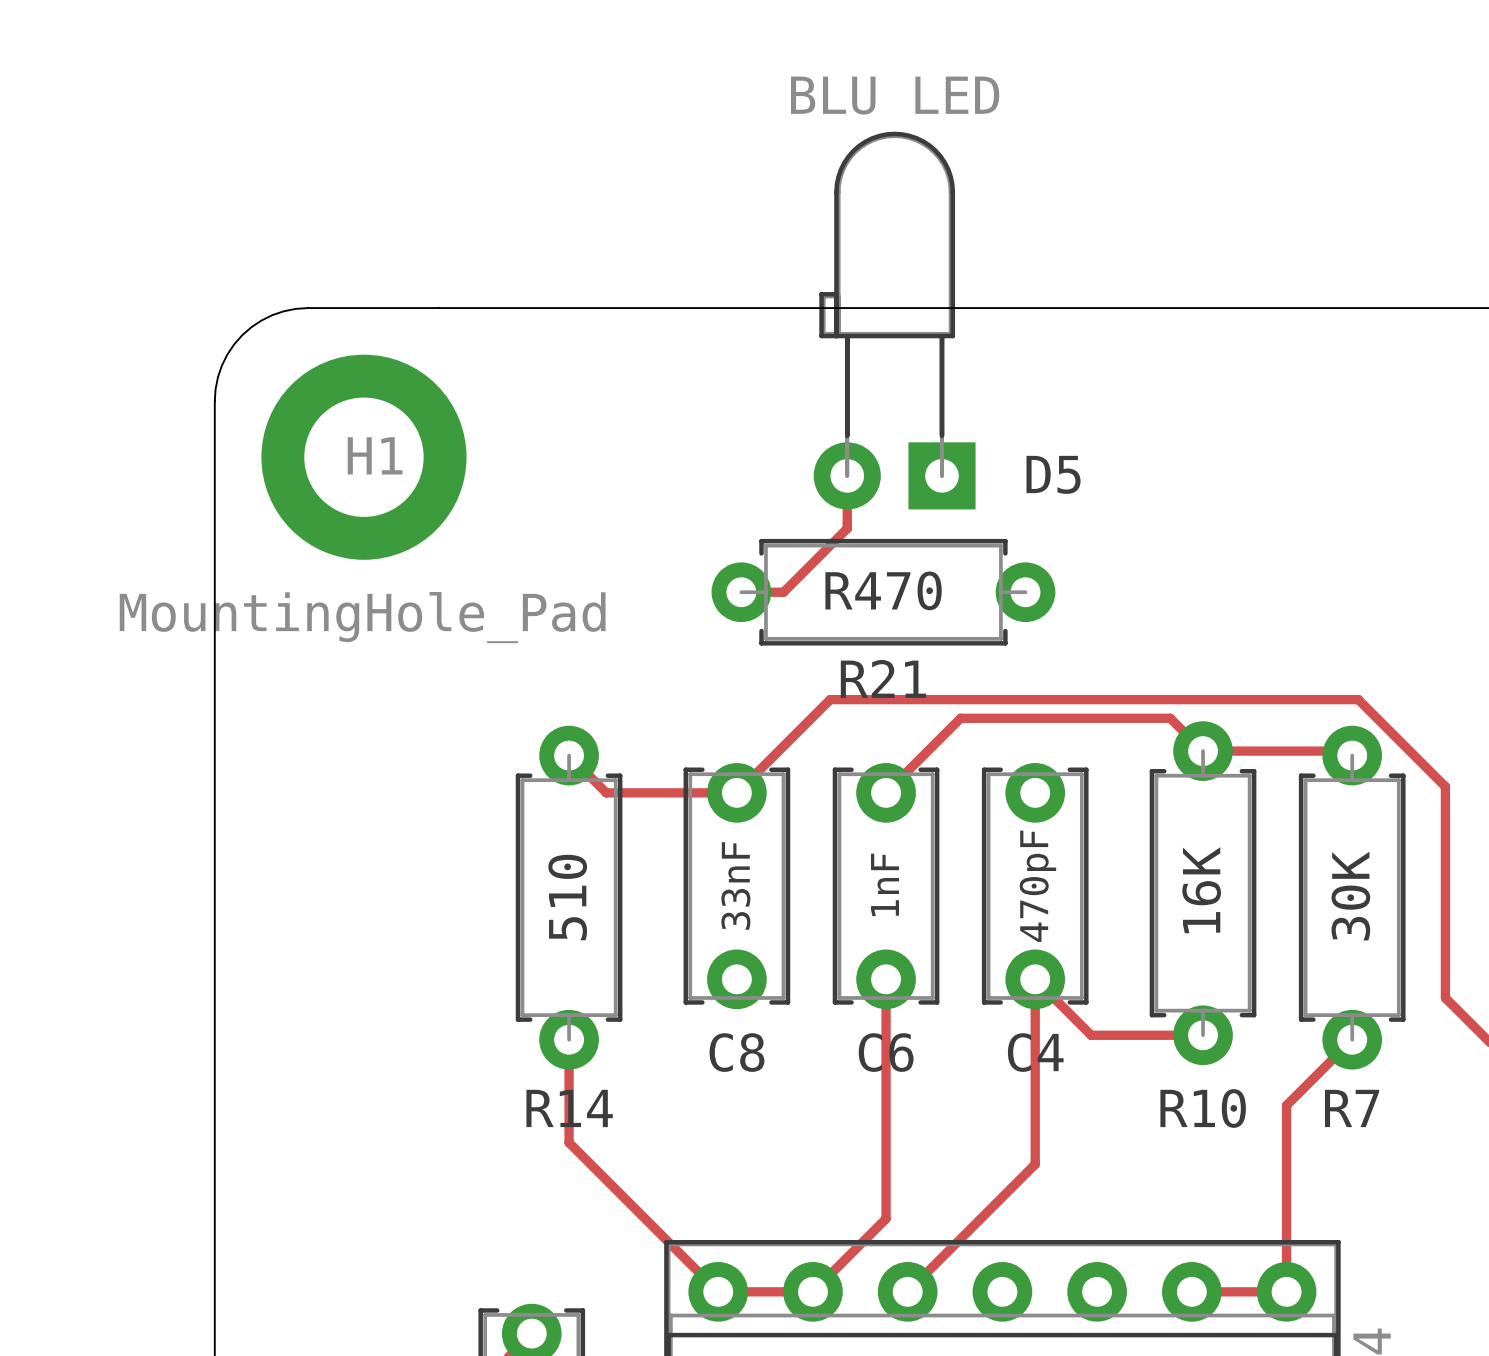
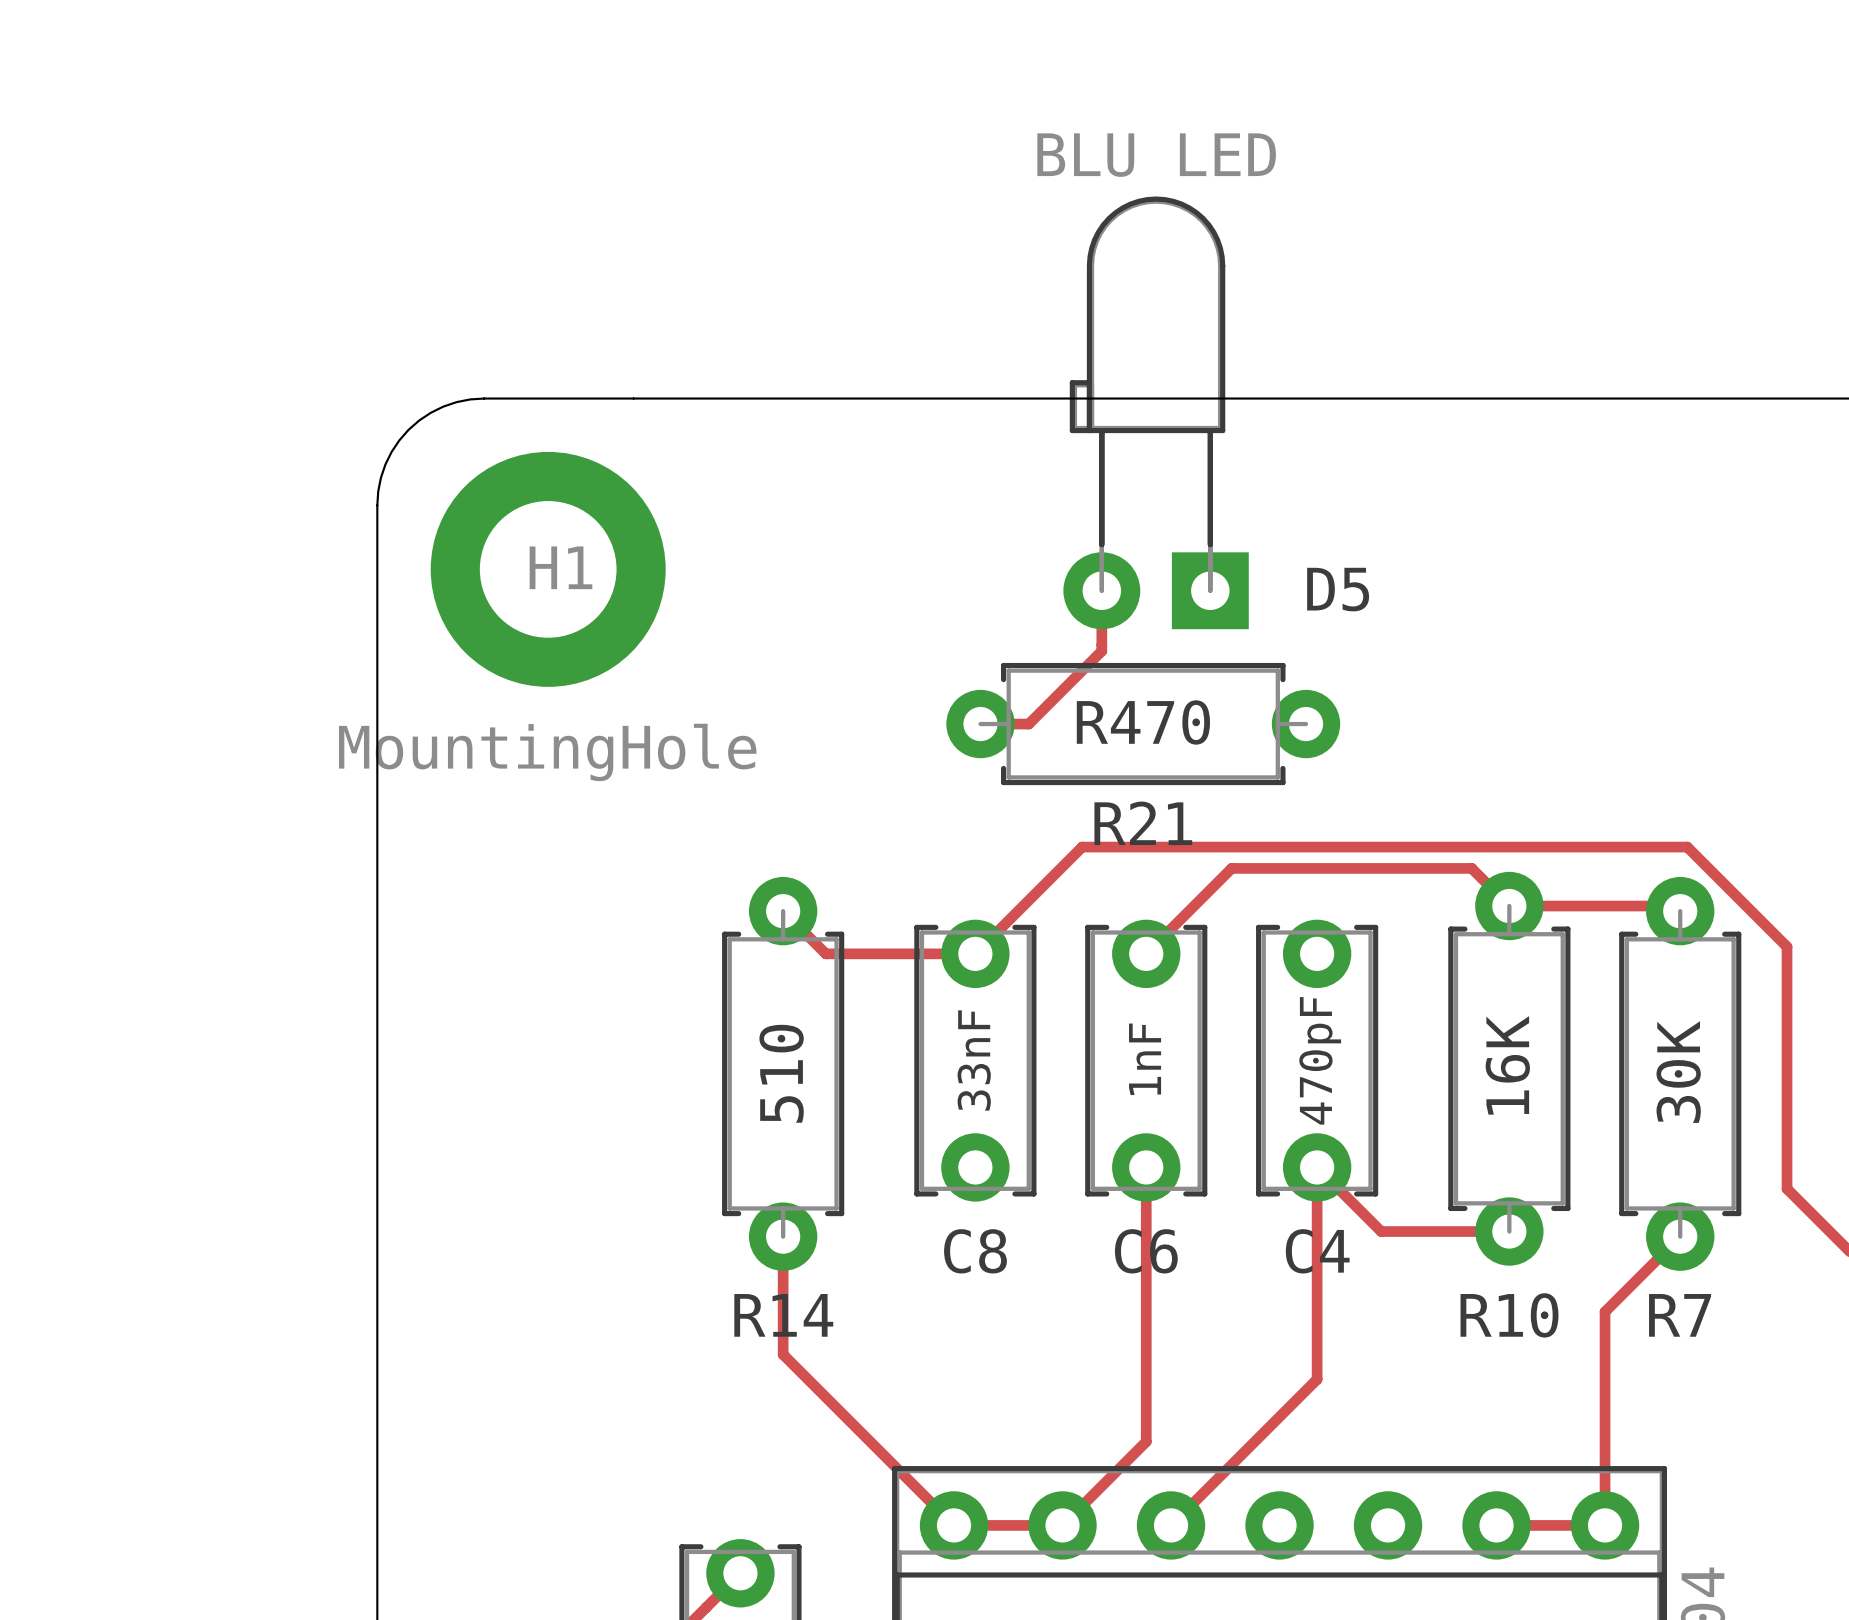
H1 value: MountingHole_Pad (362, 617) -> MountingHole (547, 752)

